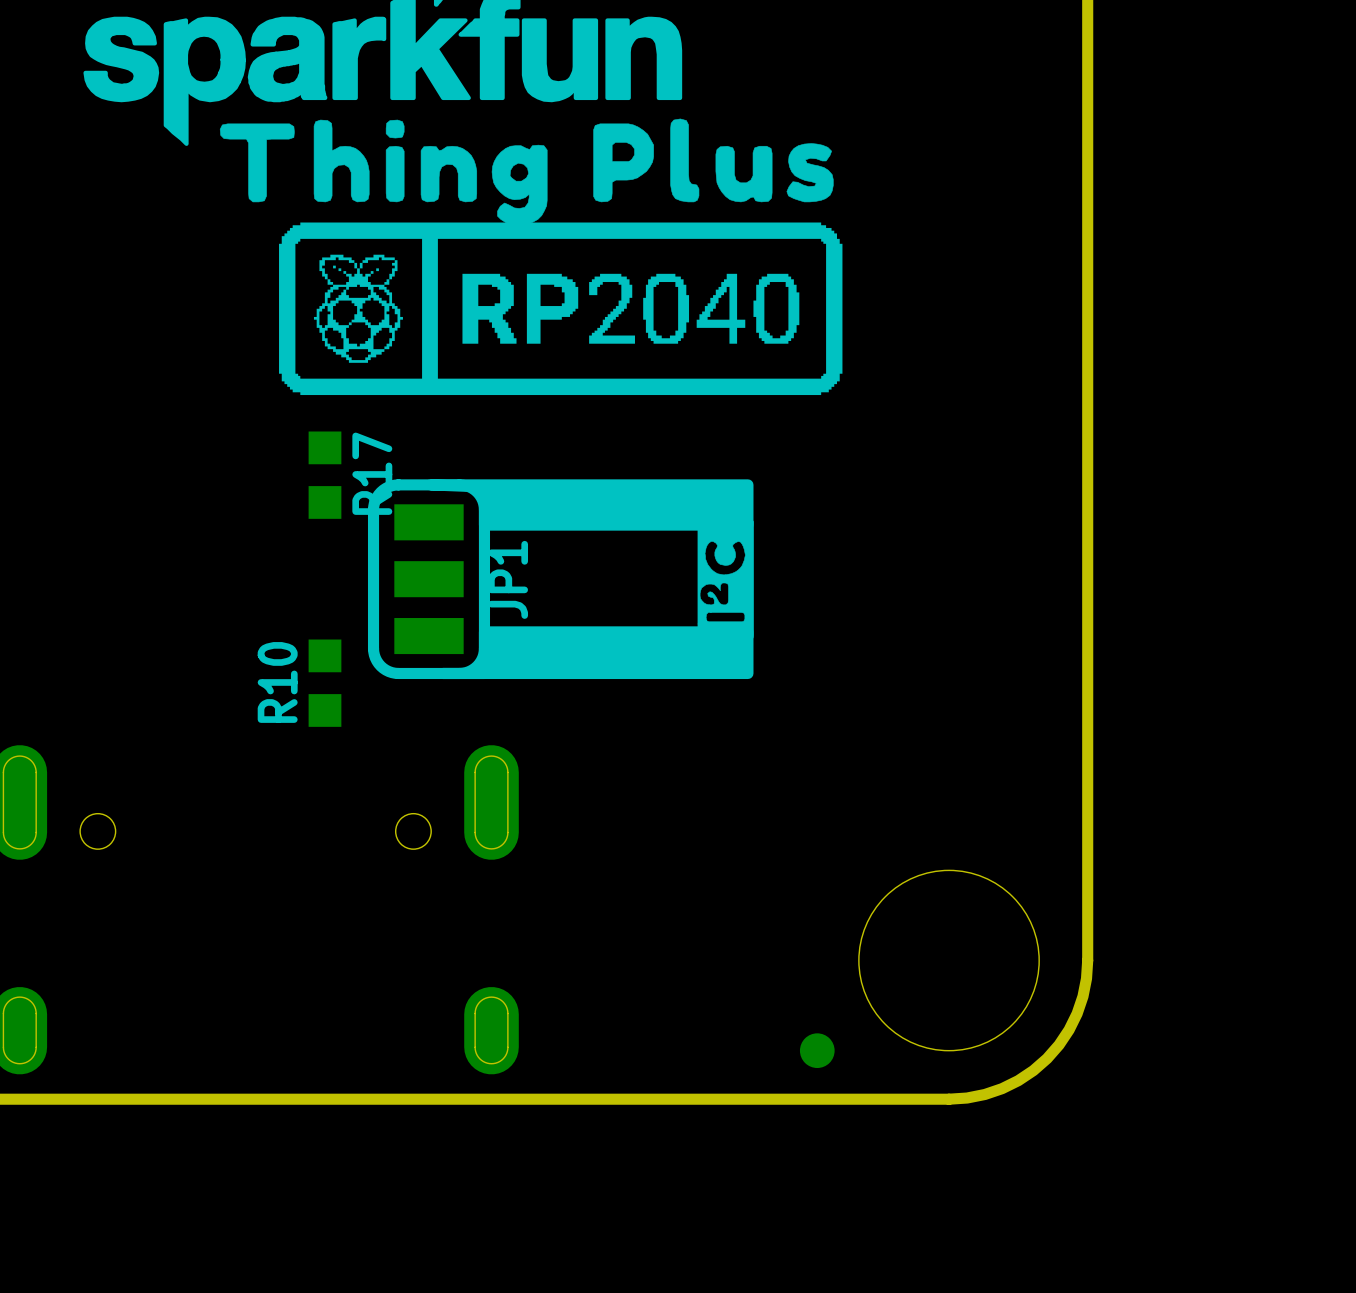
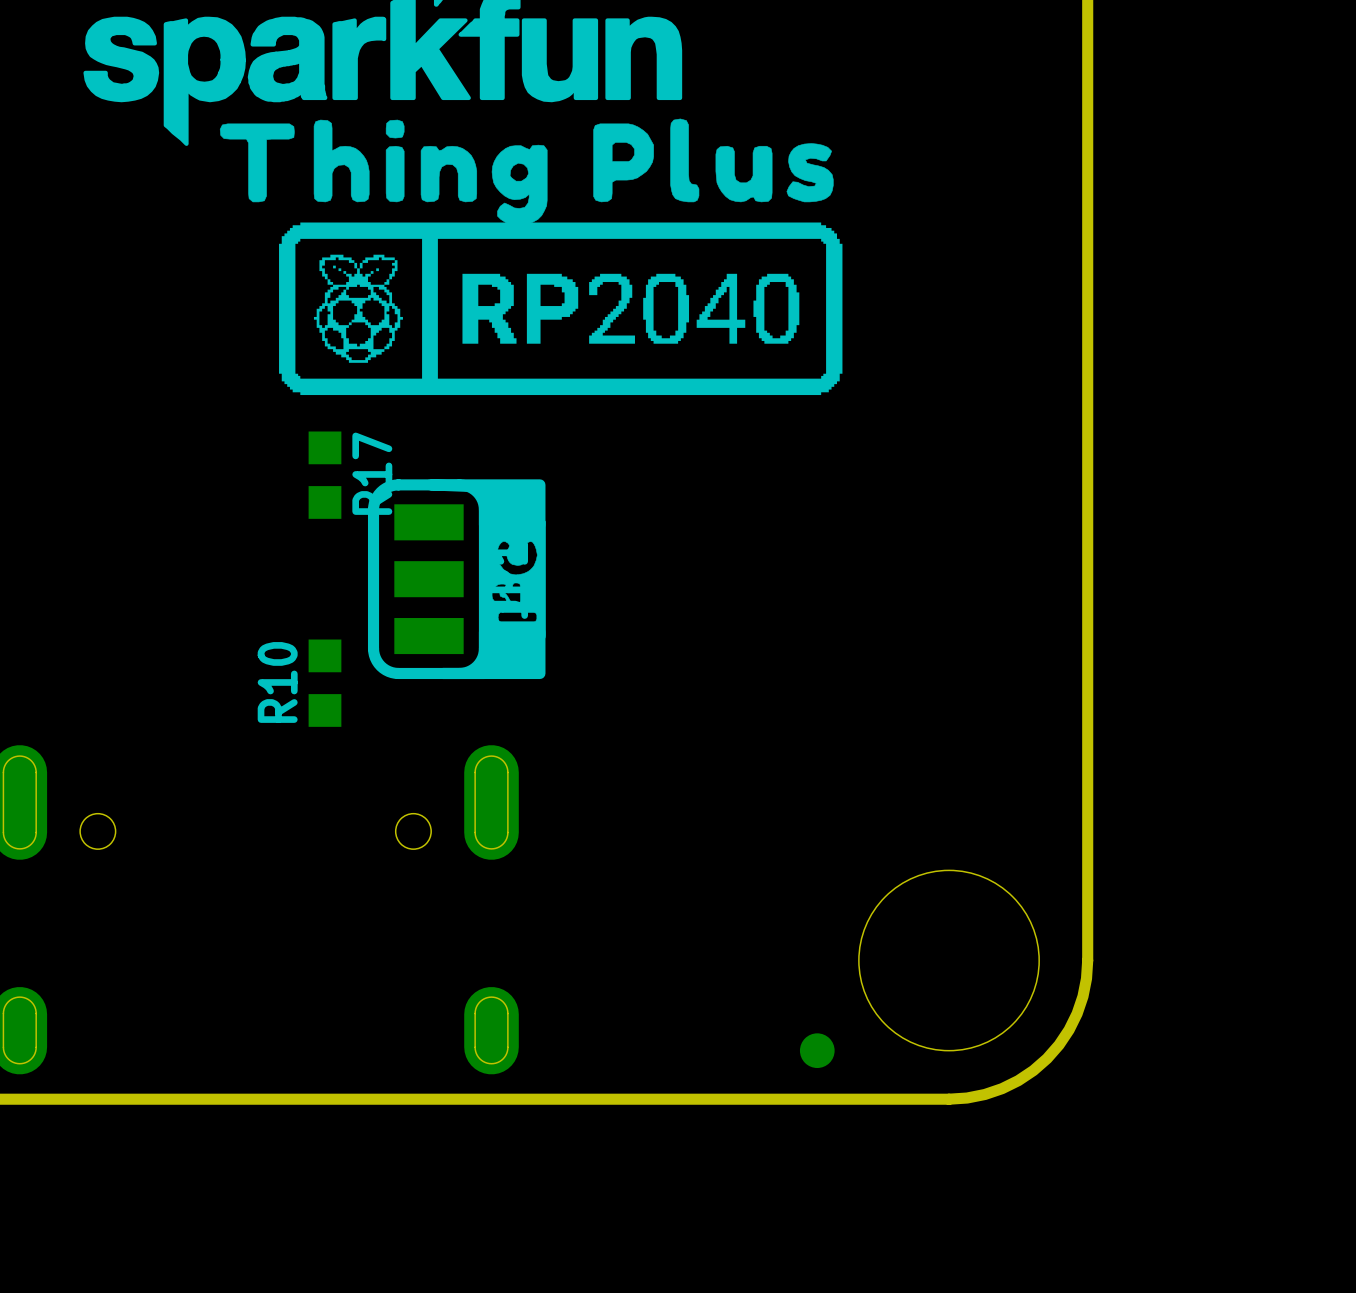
drawing: [424, 479, 754, 531] -> none
drawing: none -> [424, 479, 546, 531]
drawing position: (725, 579) -> (517, 579)
drawing: [437, 626, 754, 680] -> none
drawing: none -> [437, 626, 546, 680]

